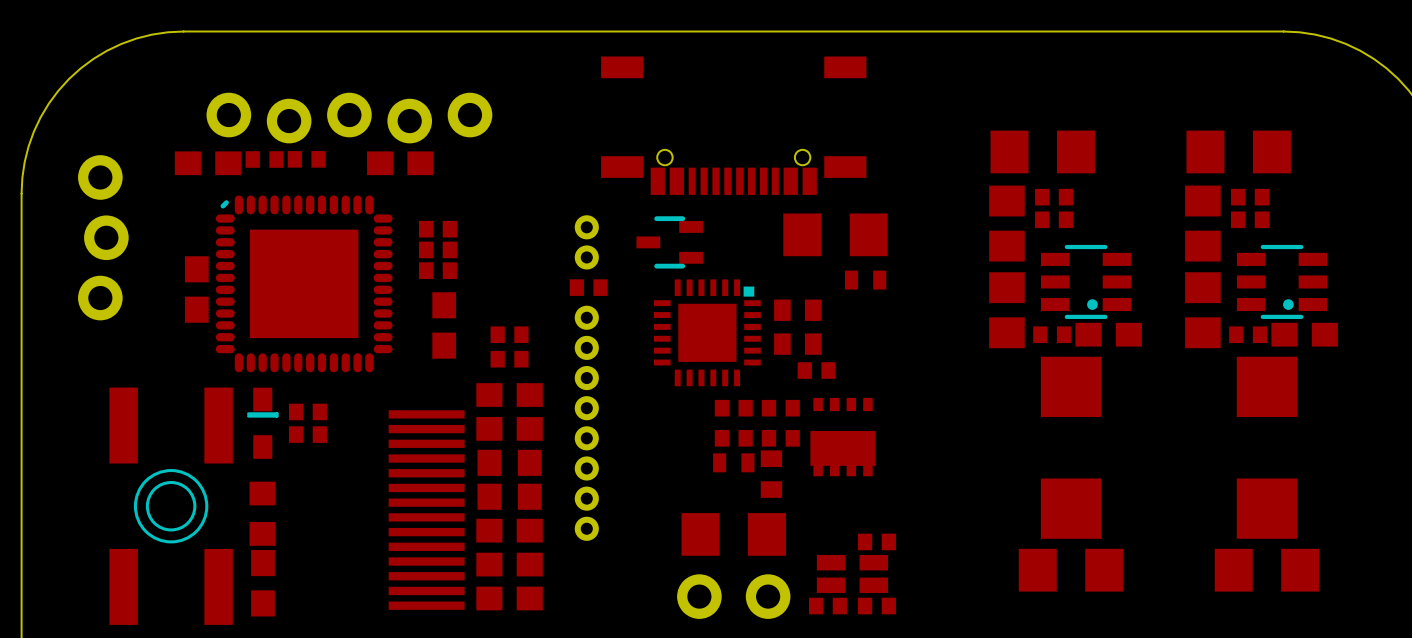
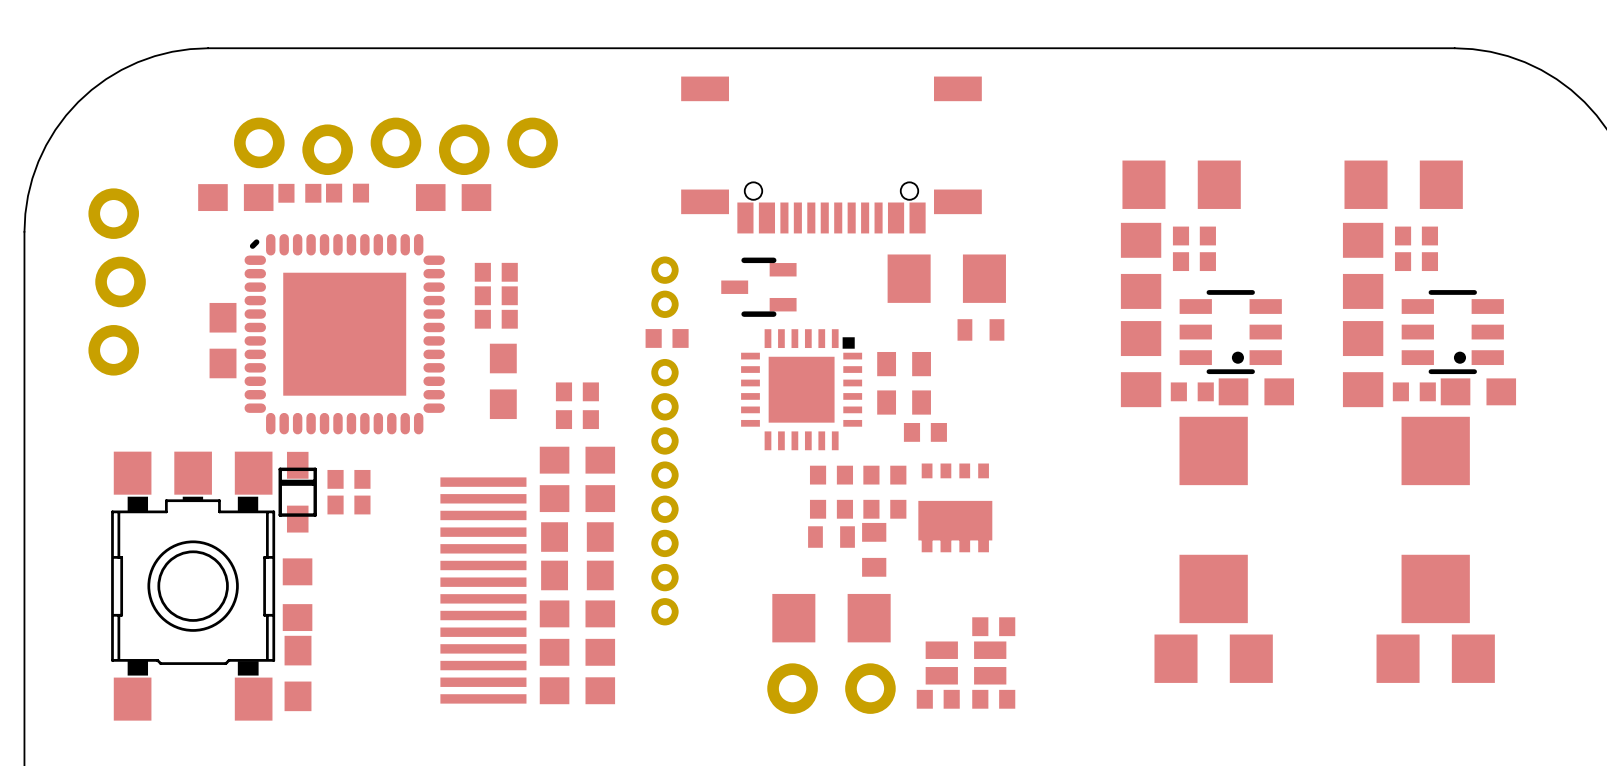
part footprint: [109, 387, 233, 625] -> [111, 451, 276, 721]
part footprint: [246, 387, 279, 459] -> [278, 451, 317, 533]

